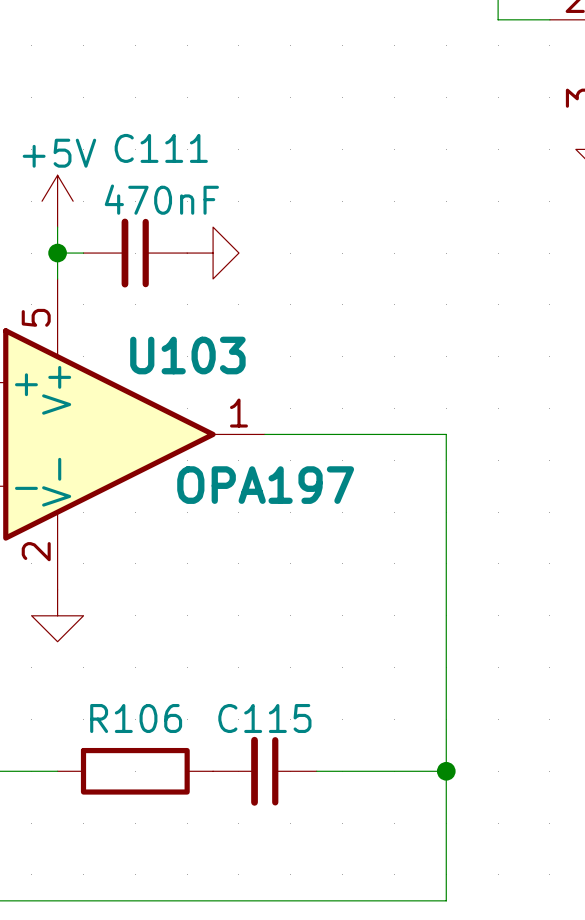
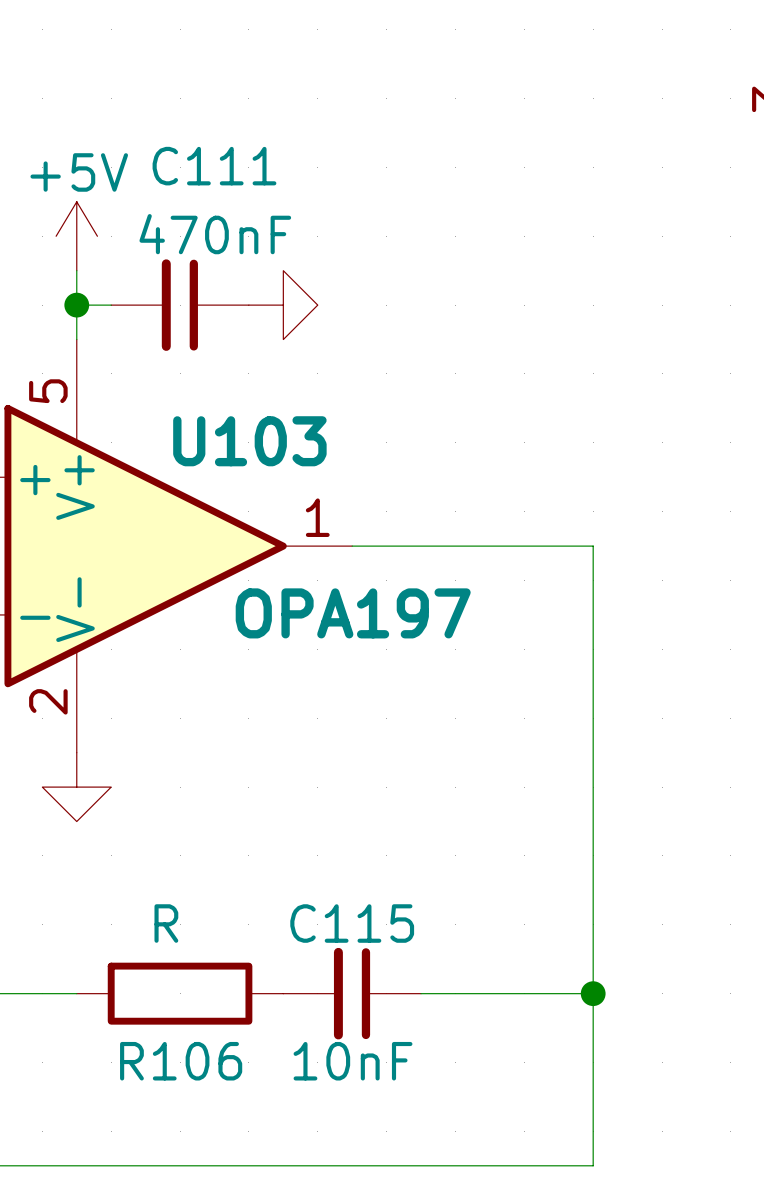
R106 value: none -> R (166, 923)
R106 name position: R106 (136, 718) -> R106 (181, 1061)
C115 value: none -> 10nF (353, 1061)

